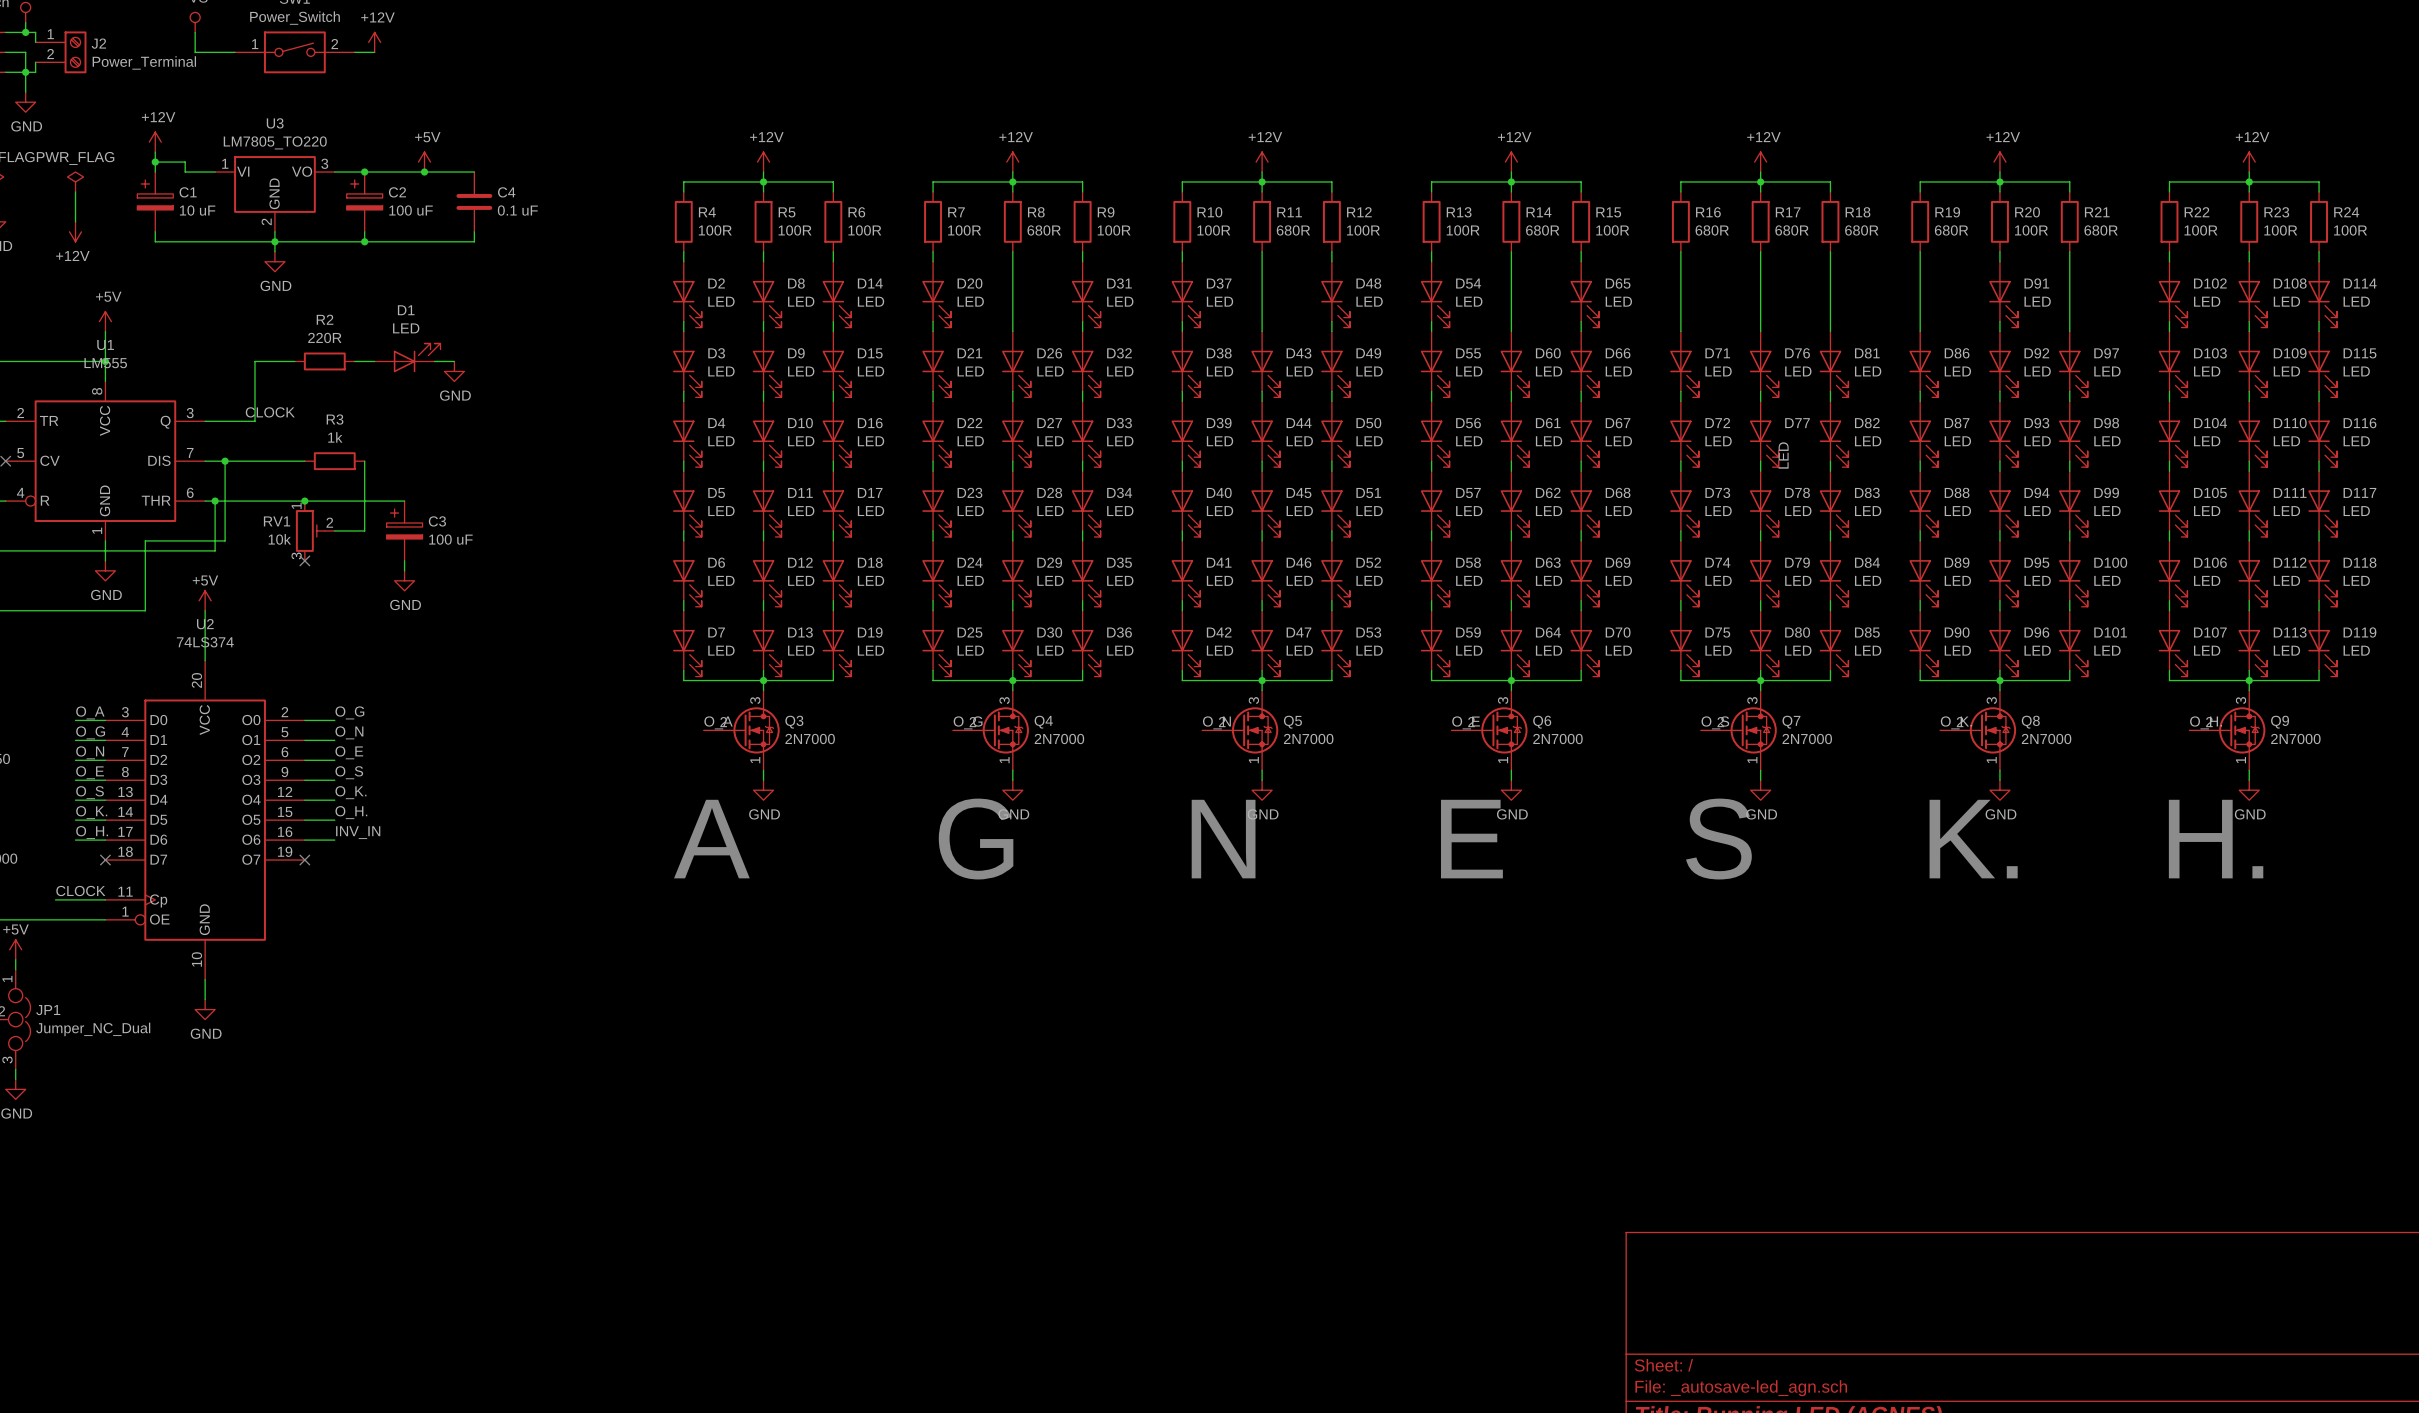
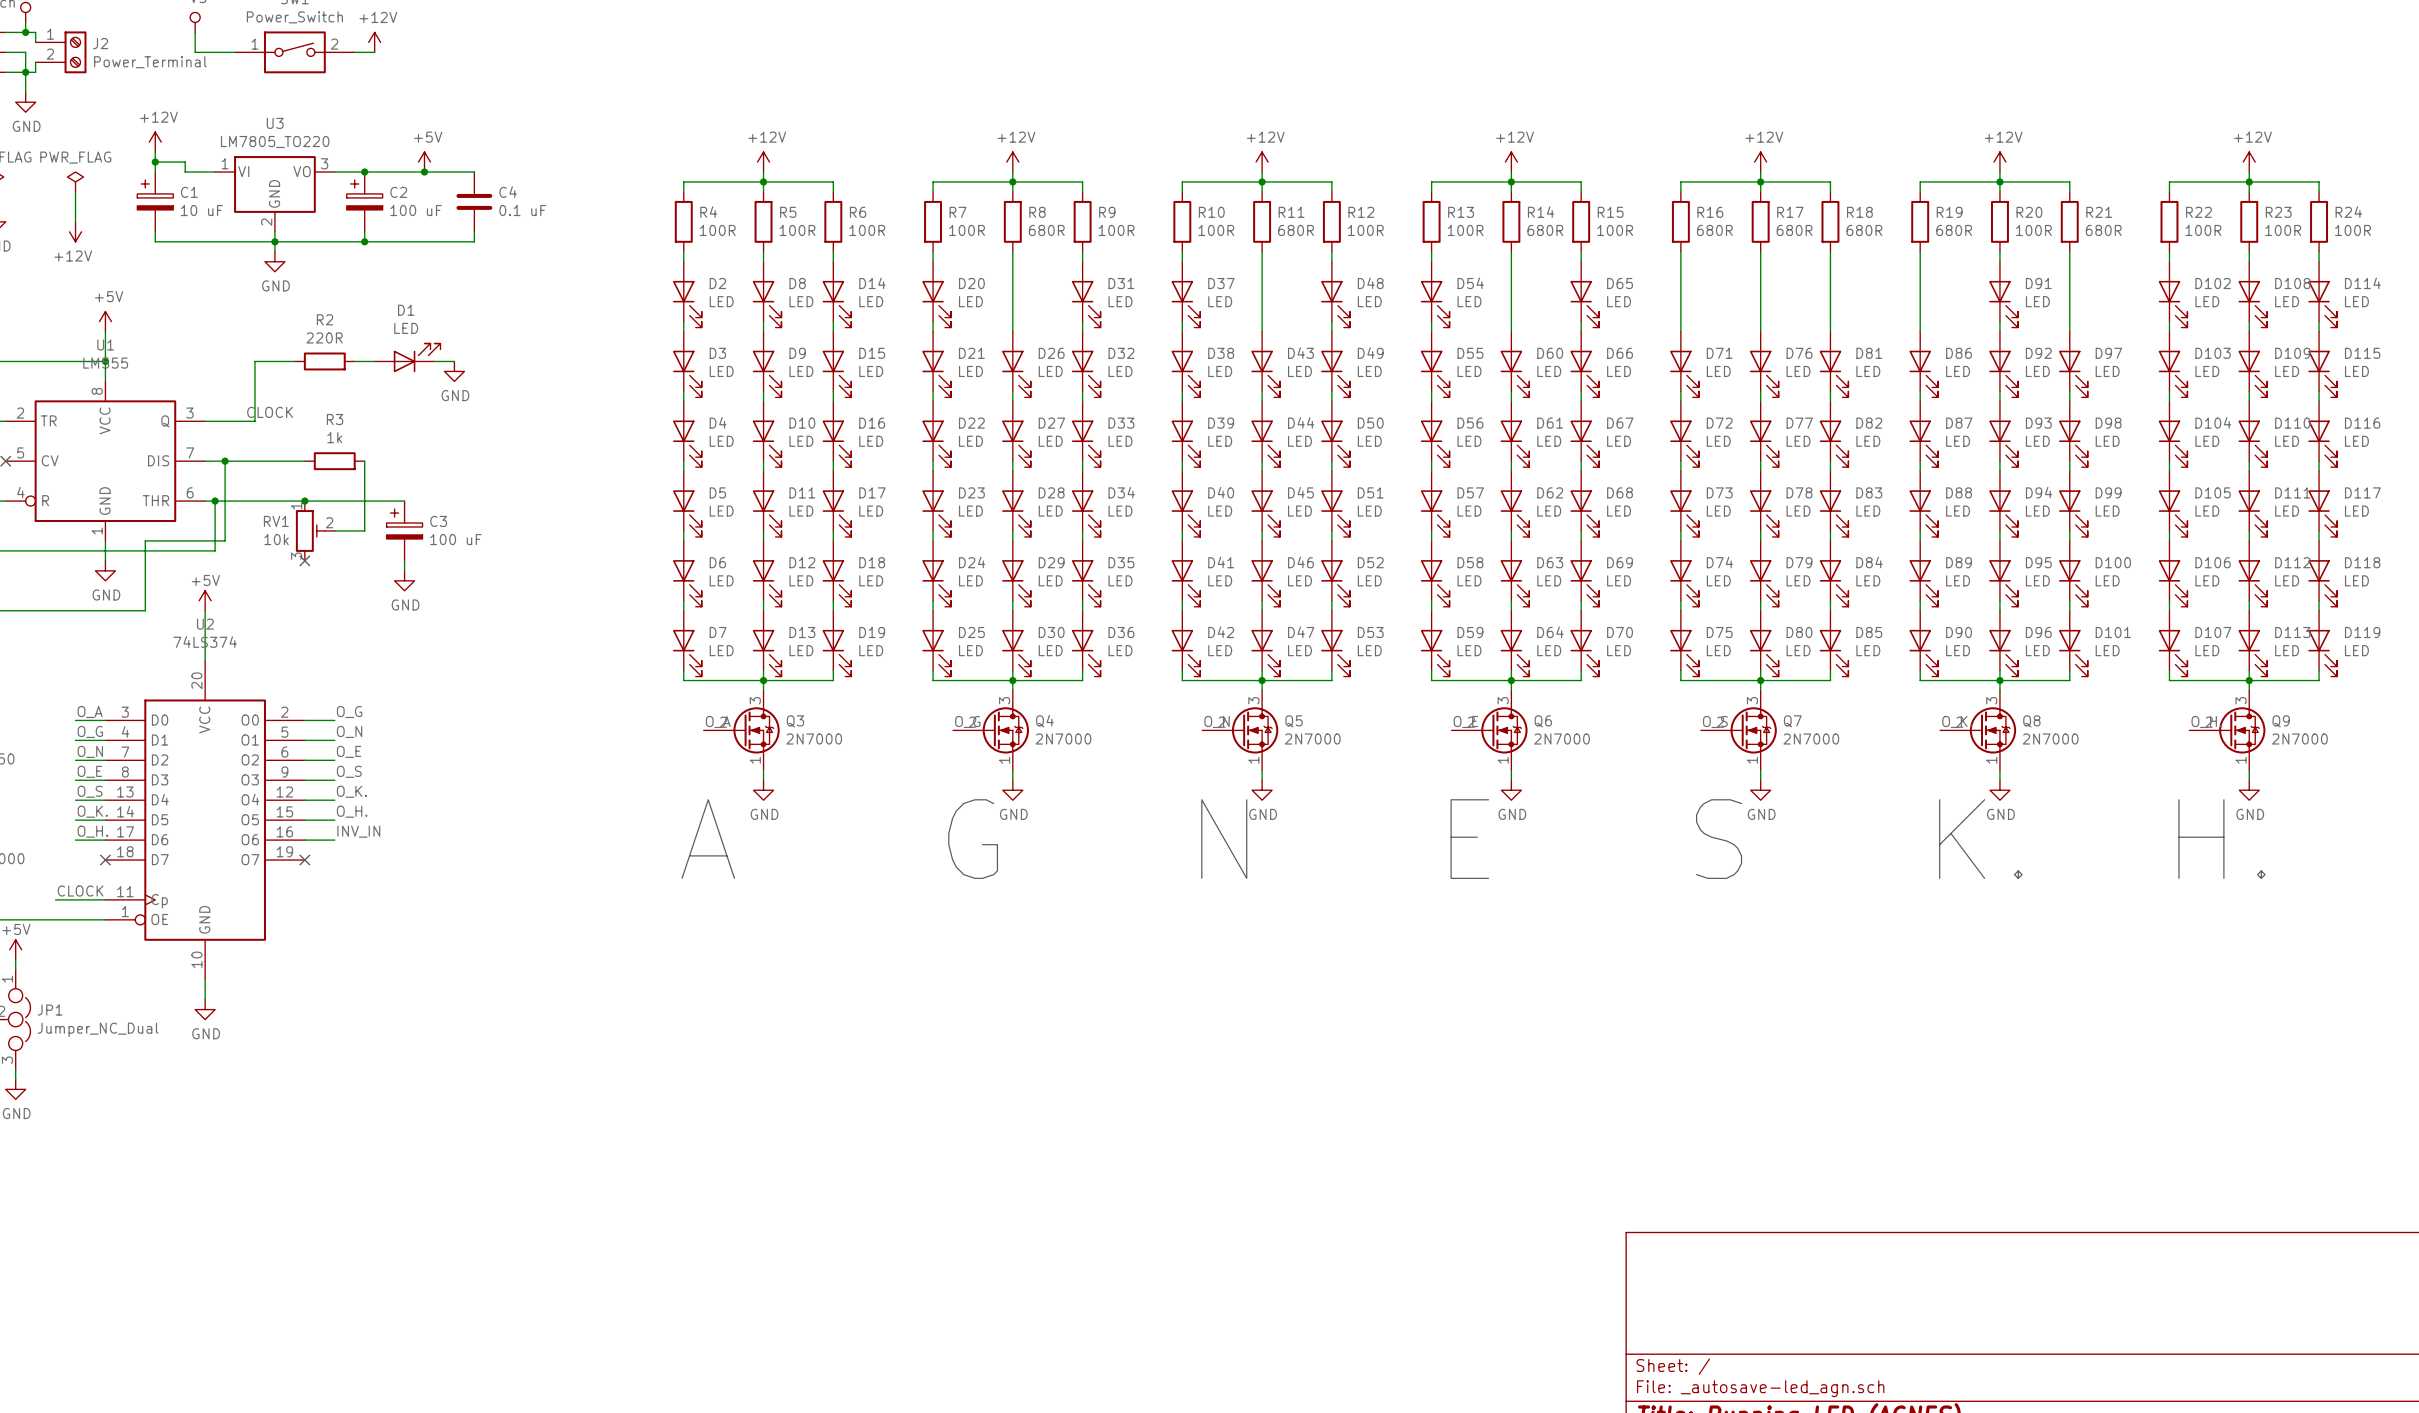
D77 value rotation: 0° (1783, 455) -> 90° clockwise (1798, 441)

